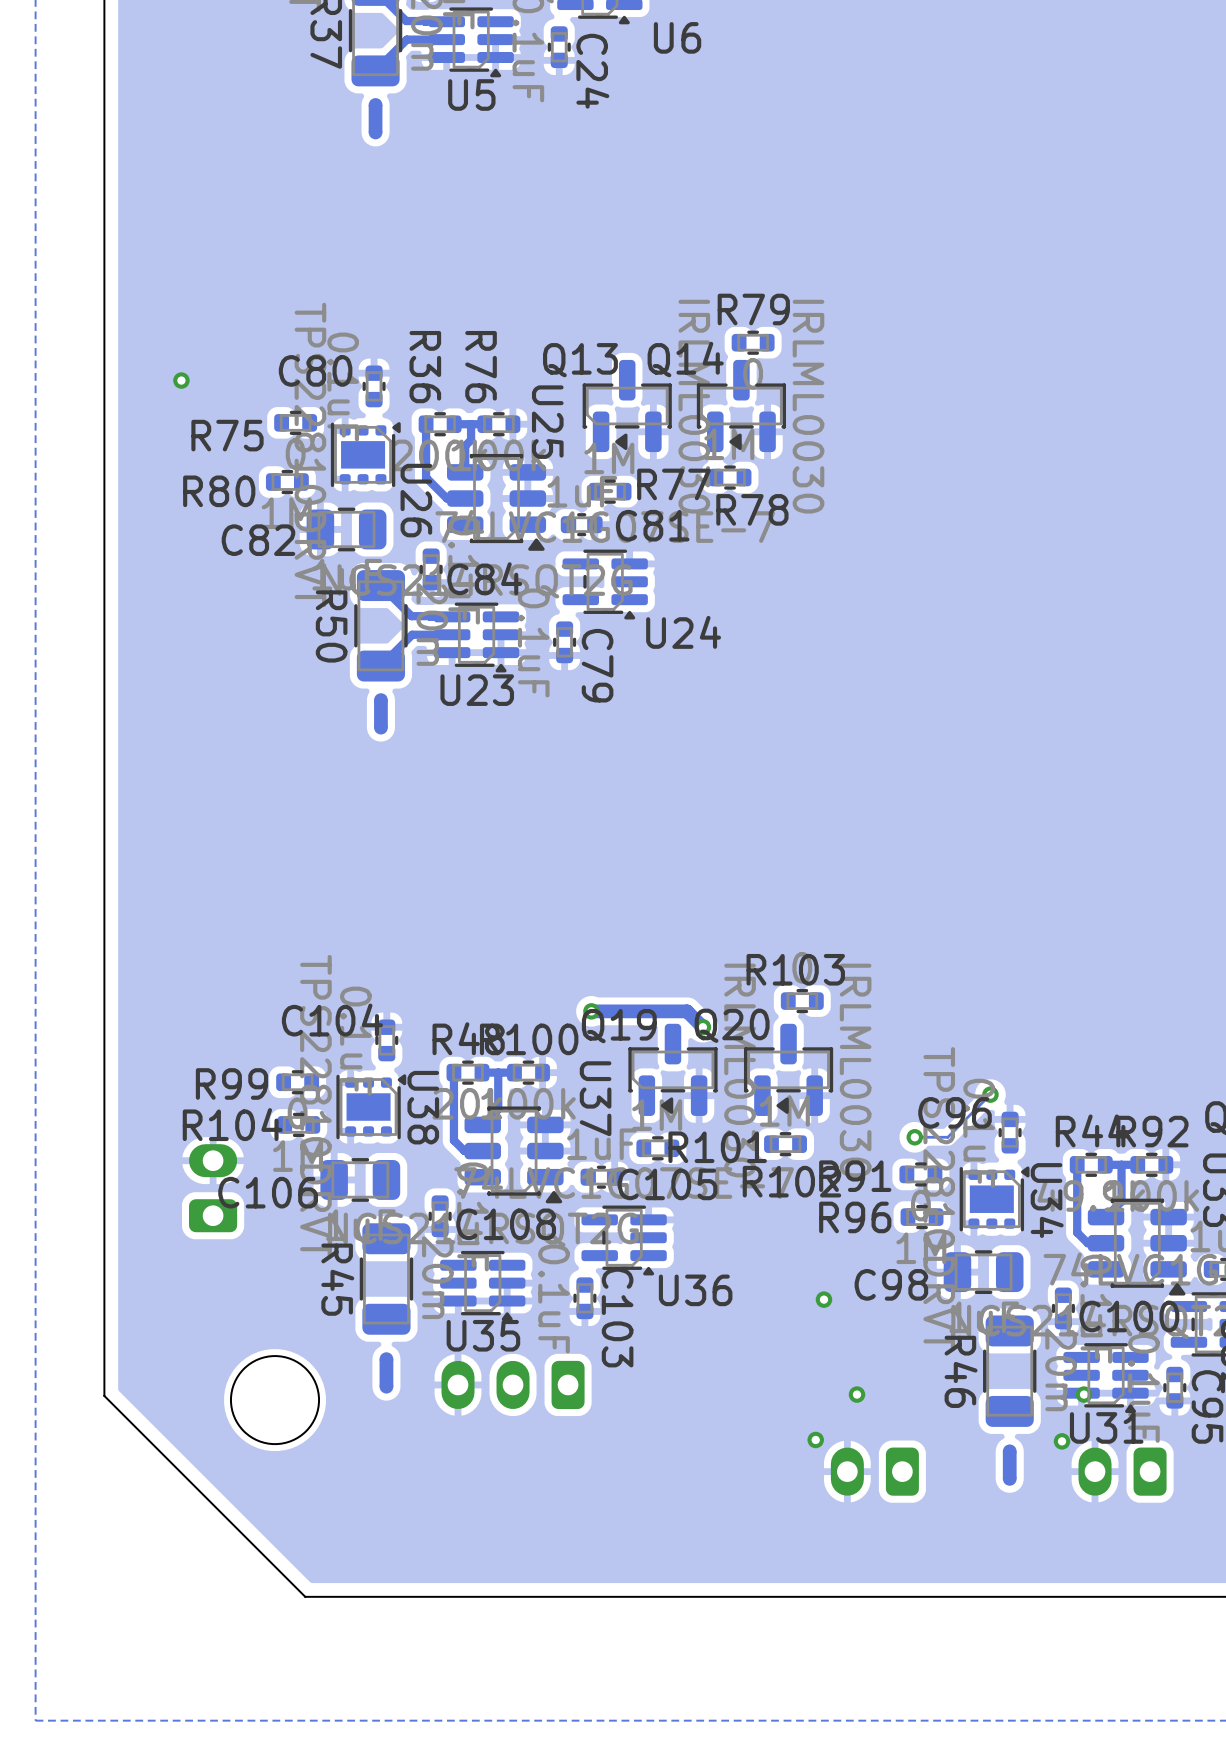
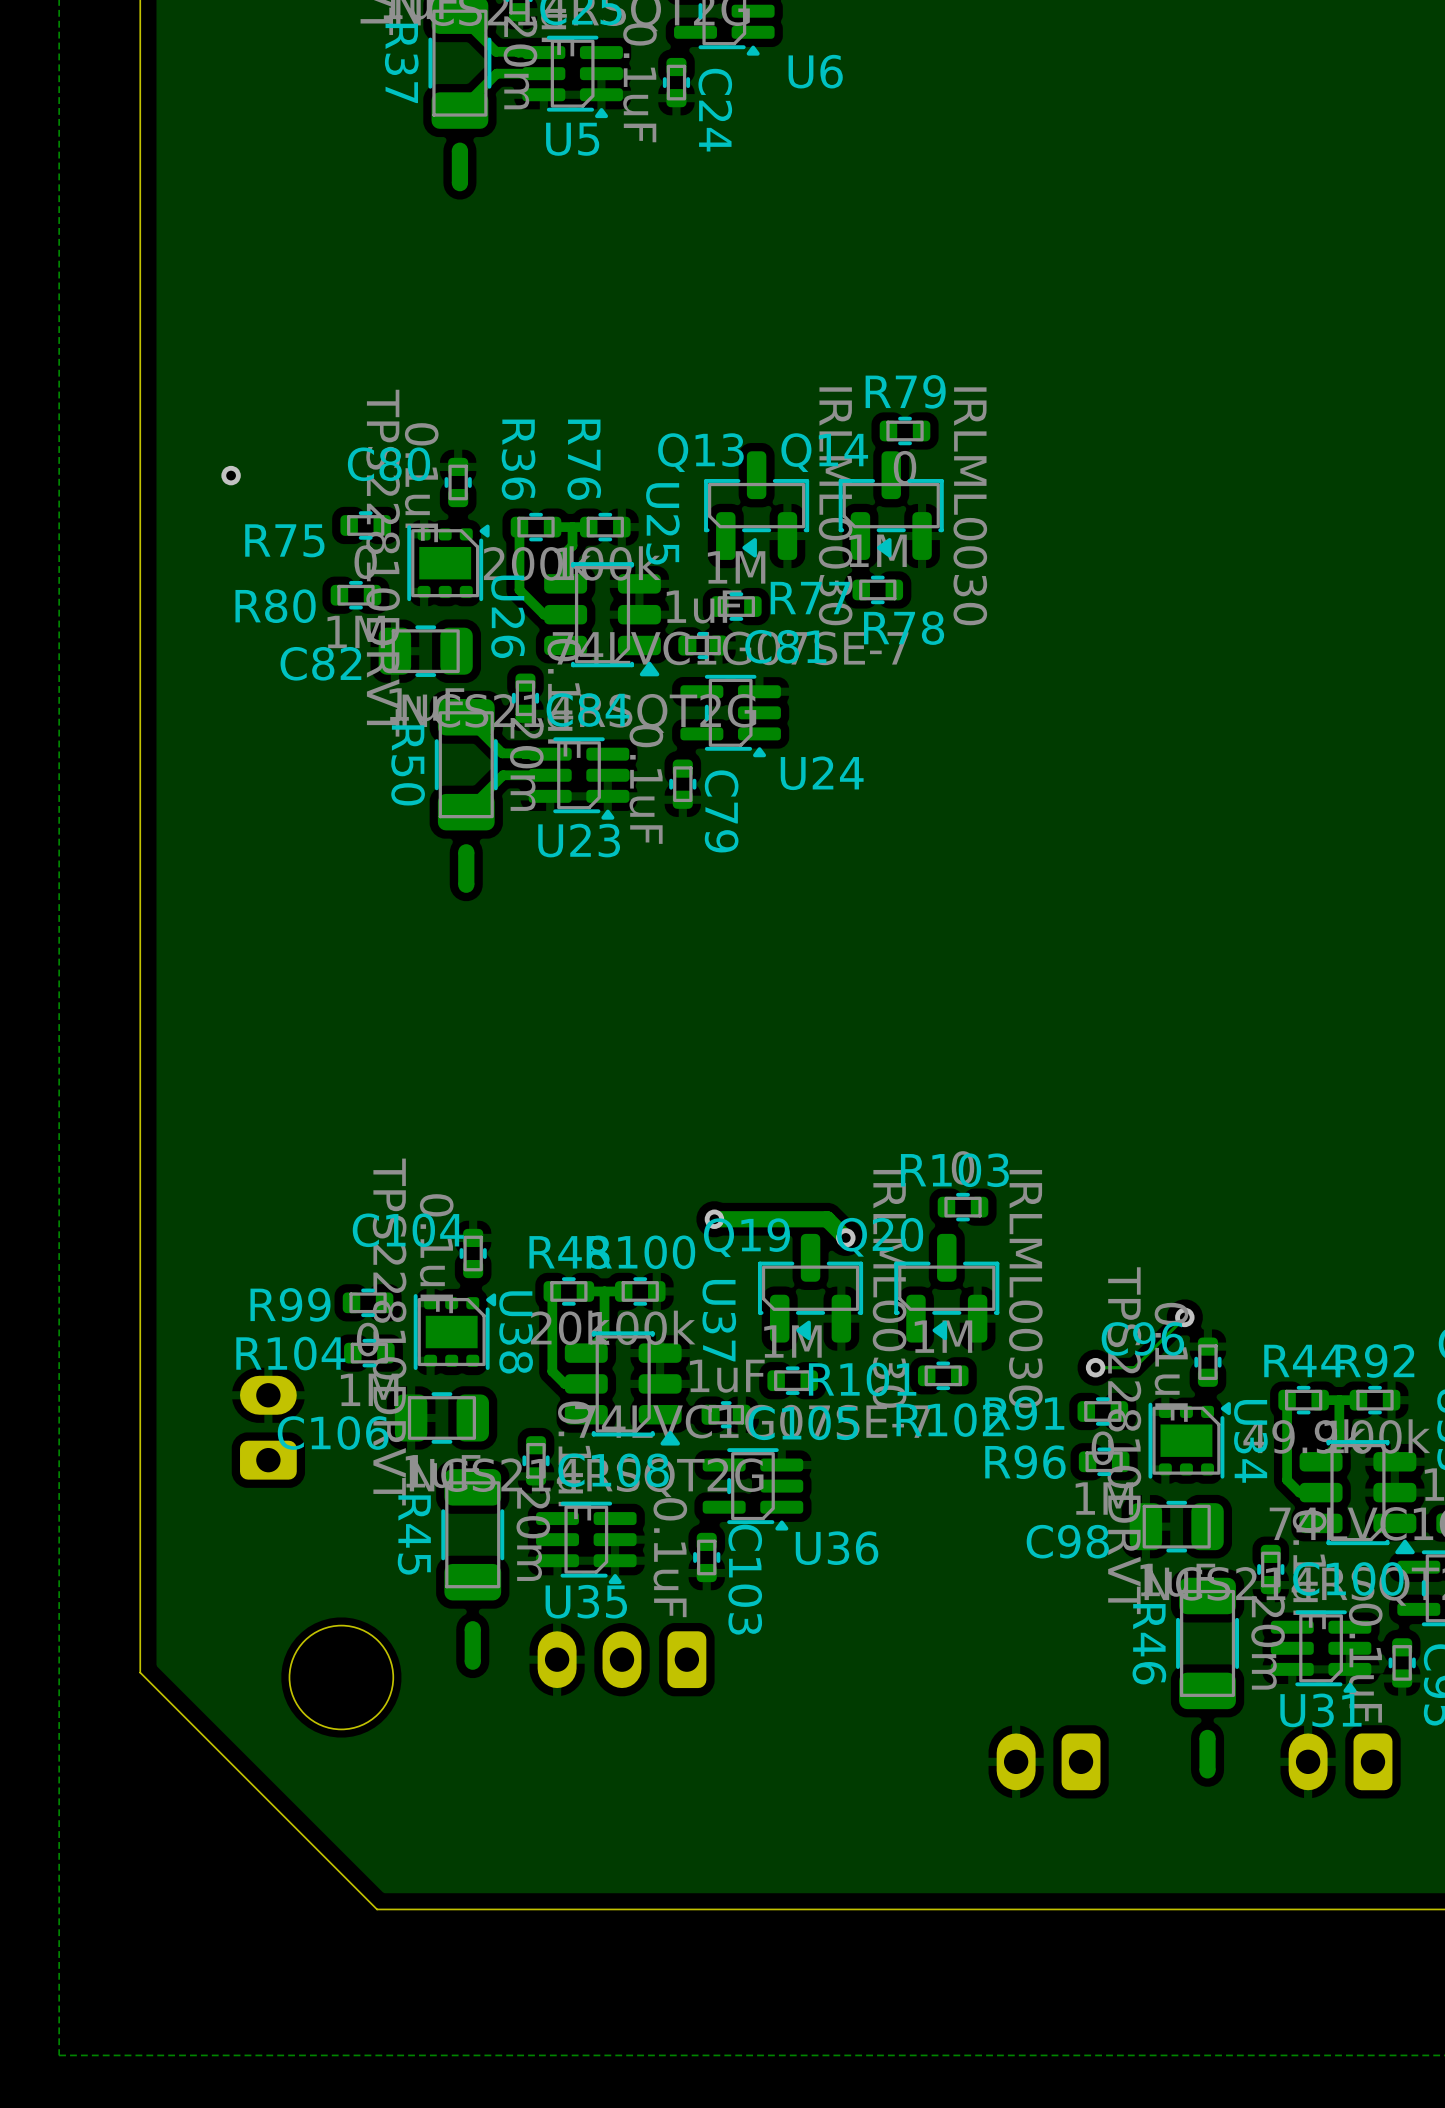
via: (823, 1299) -> none
via: (857, 1394) -> none
via: (1084, 1394) -> none
via: (815, 1439) -> none
via: (1062, 1441) -> none

